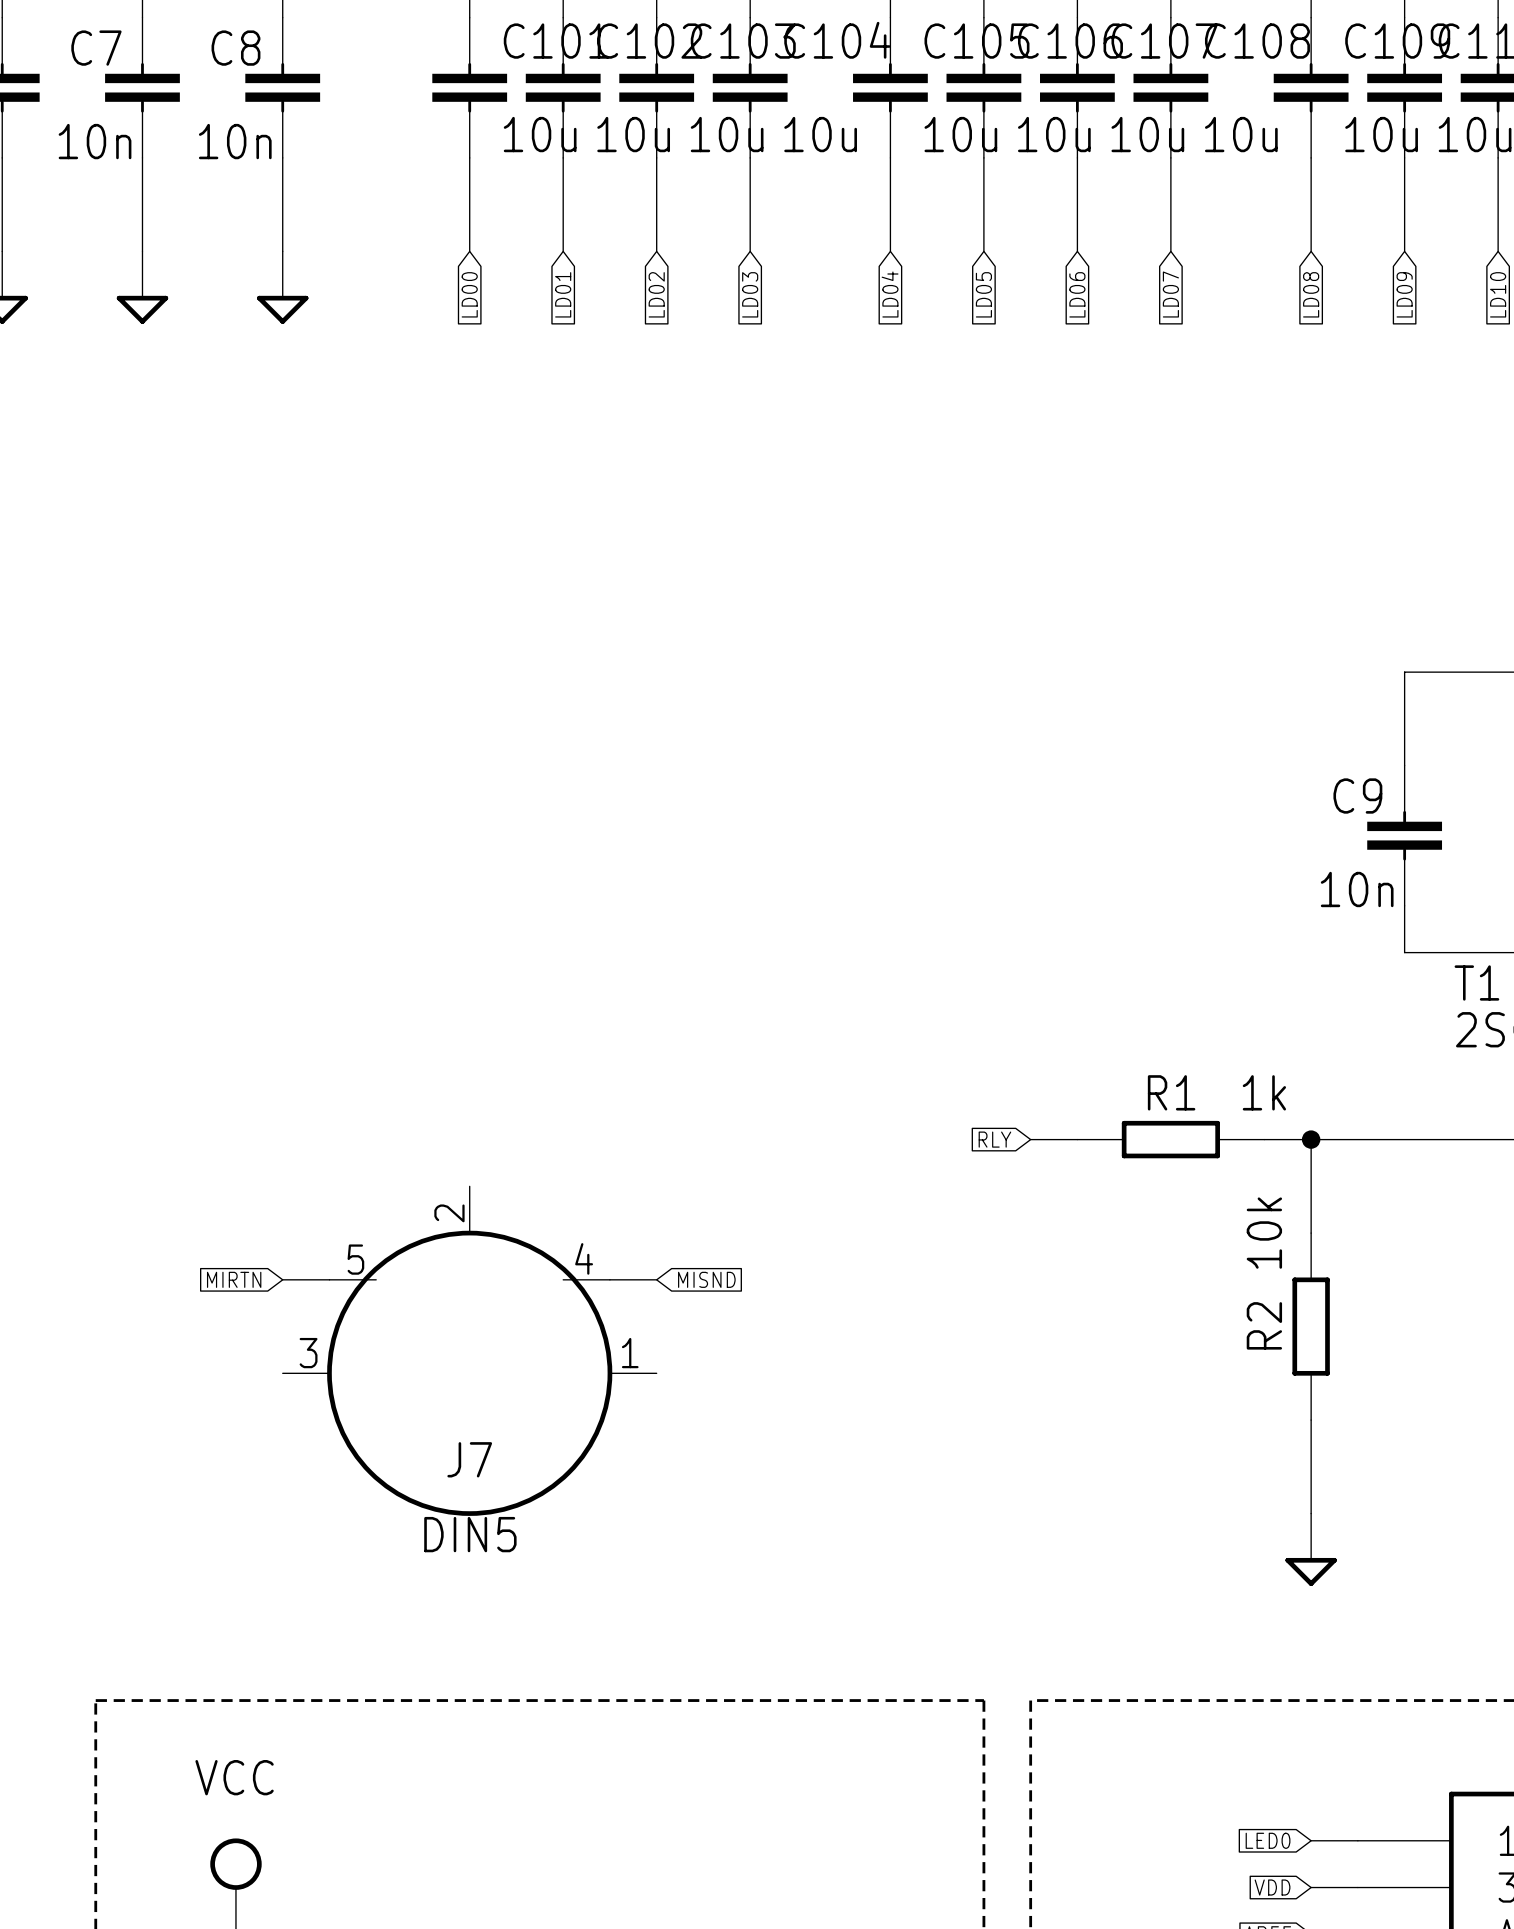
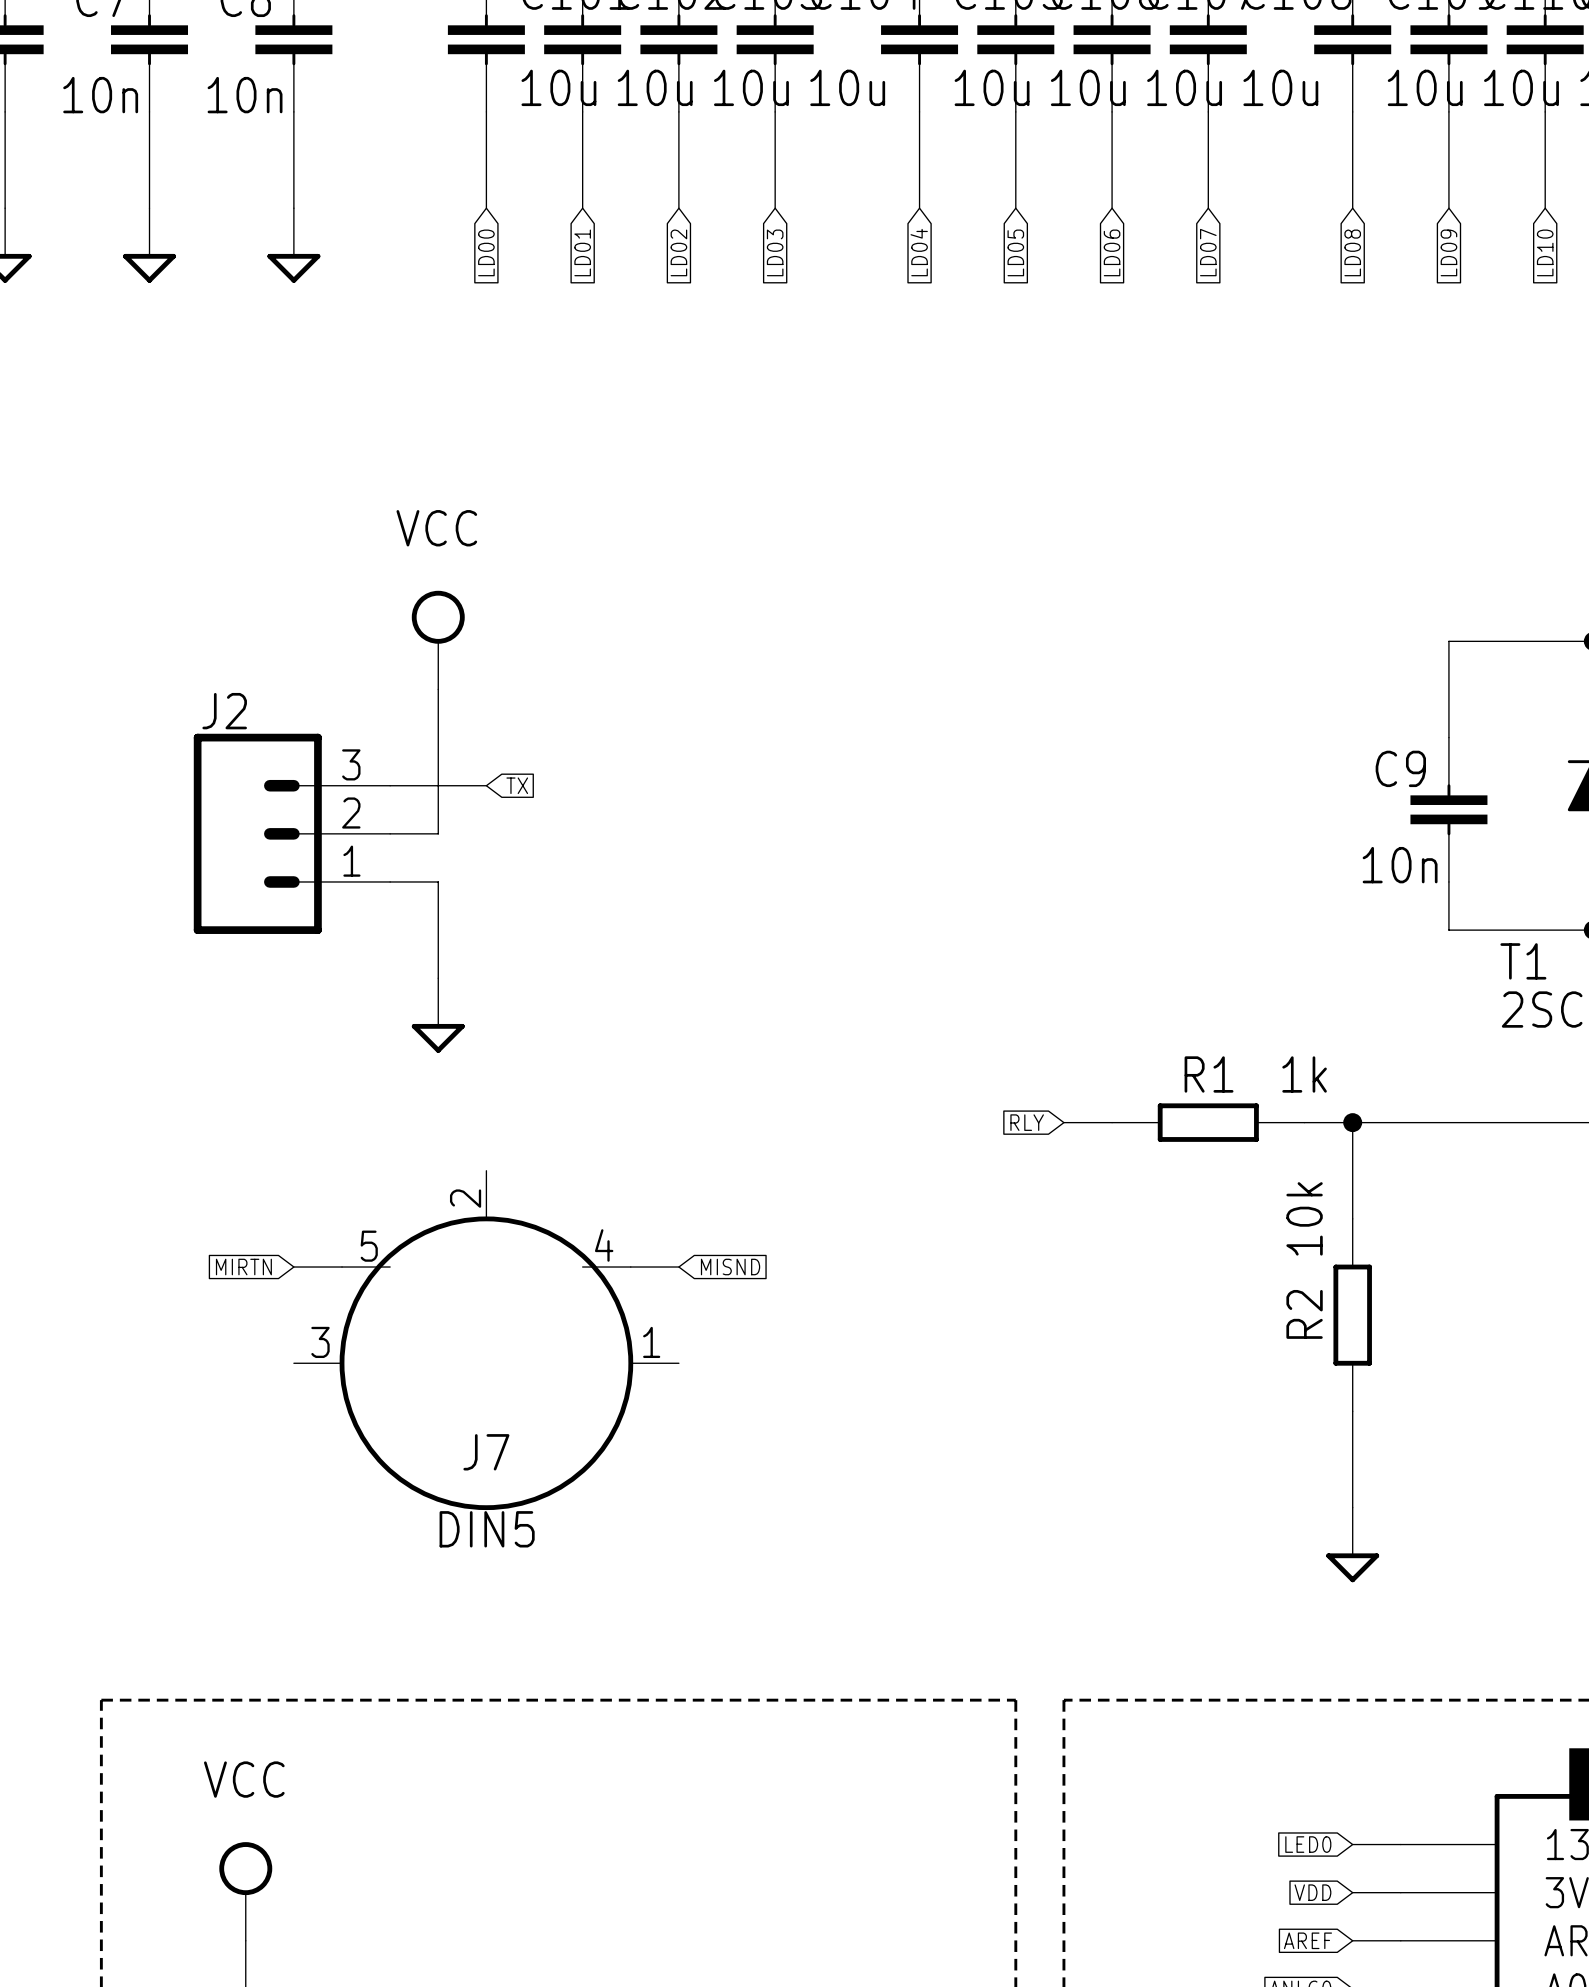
power symbol: none -> VCC (438, 640)
wire: none -> (438, 689) (438, 833) (390, 833)
wire: none -> (390, 785) (486, 785)
global label: none -> TX (517, 785)
J2: none -> (291, 833)
wire: none -> (390, 881) (438, 881) (438, 978)
power symbol: none -> (438, 1015)

